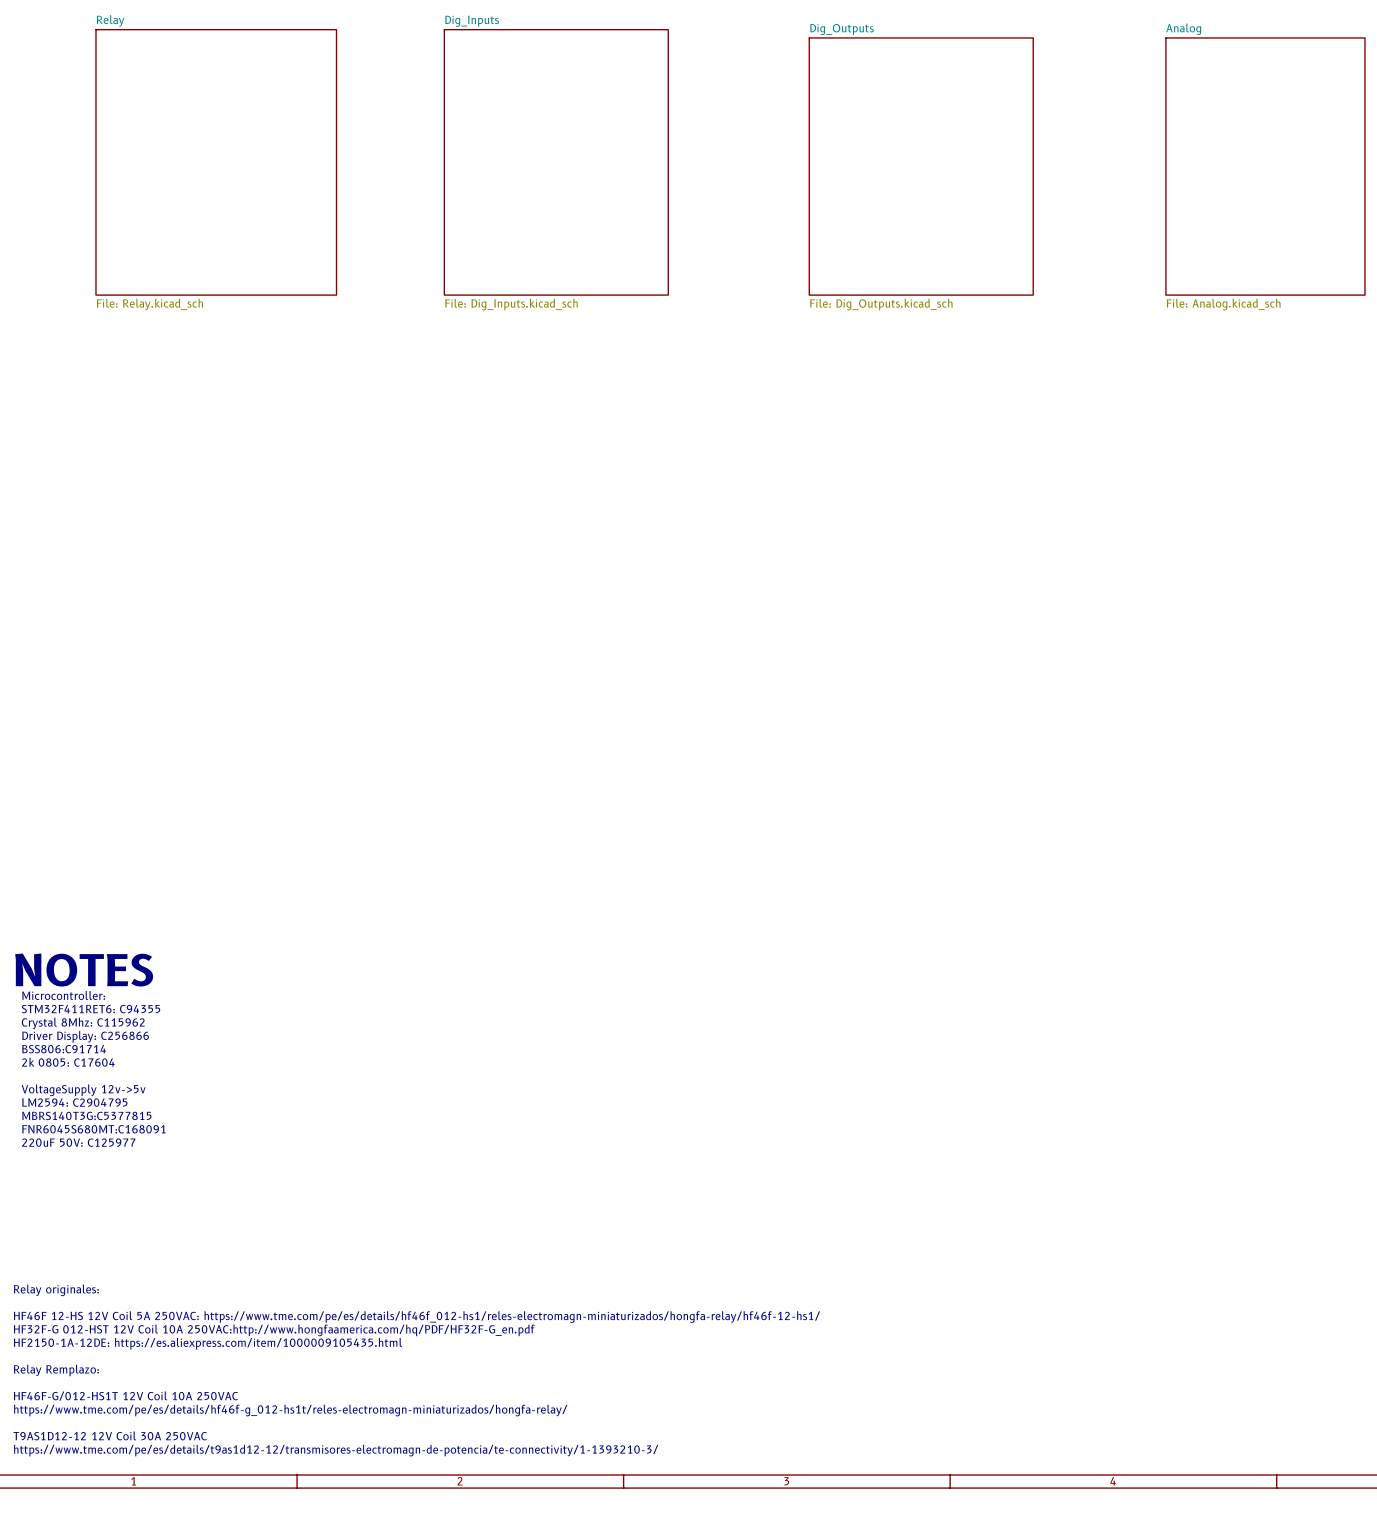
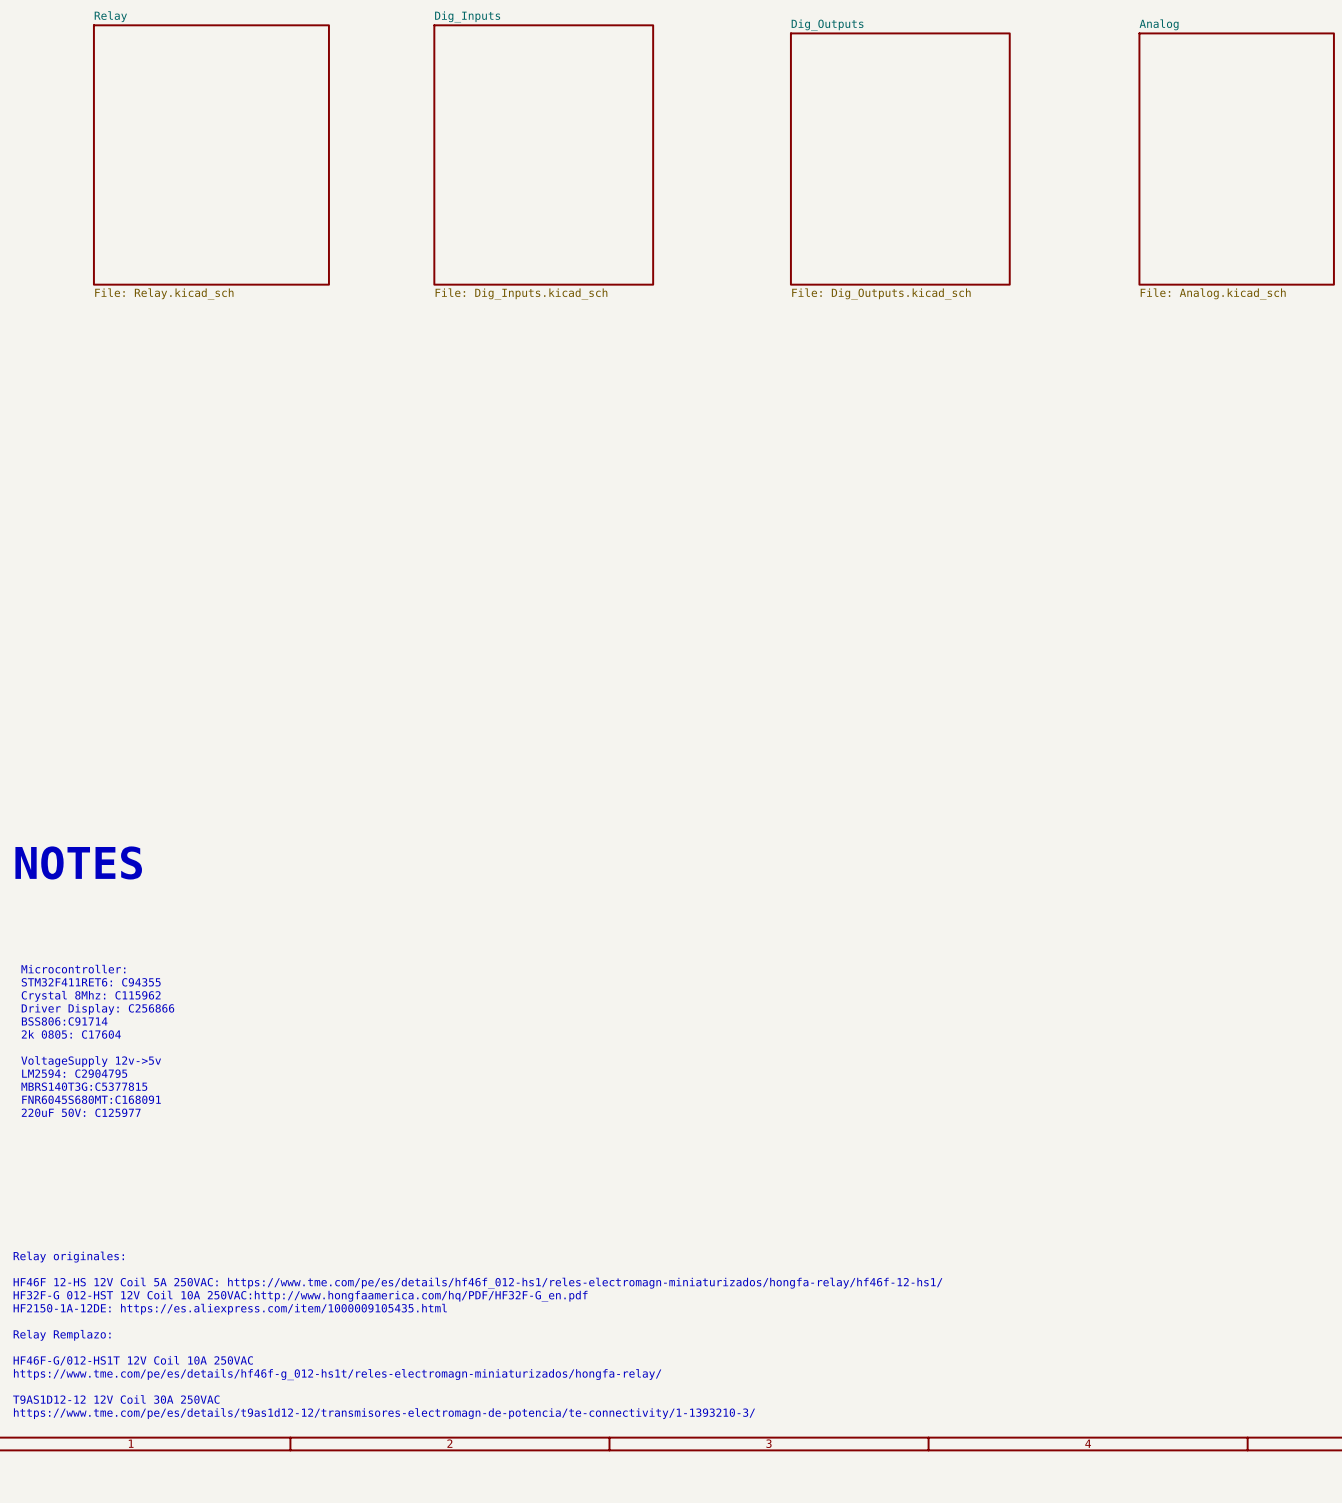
text position: NOTES (84, 970) -> NOTES (78, 862)

